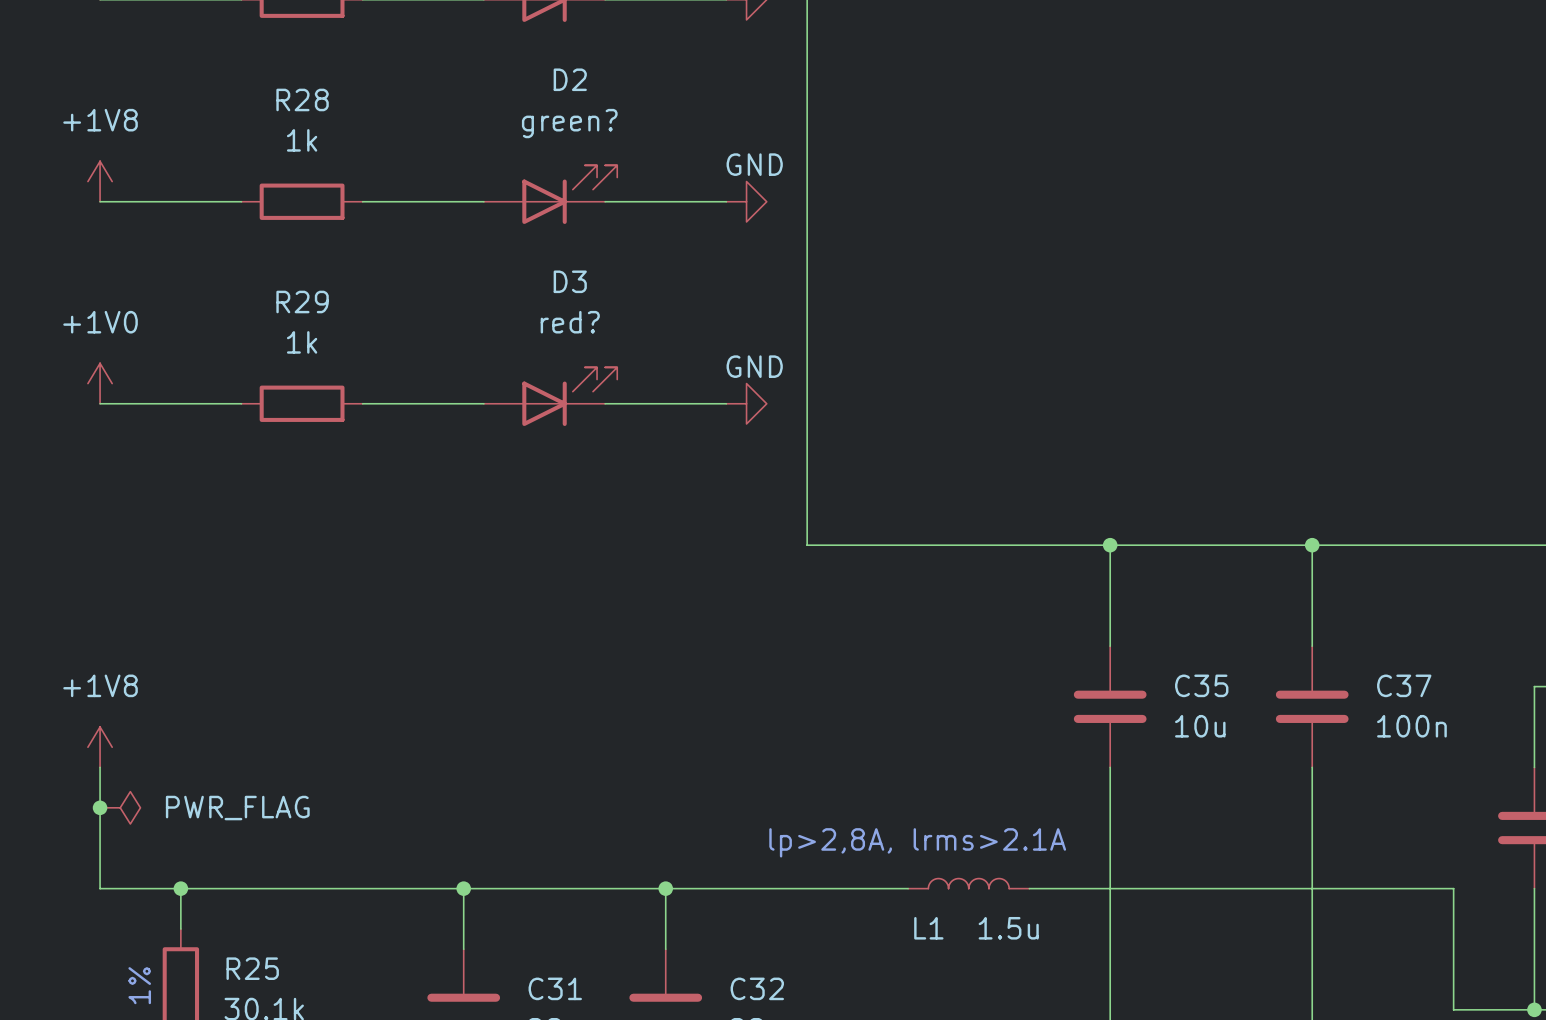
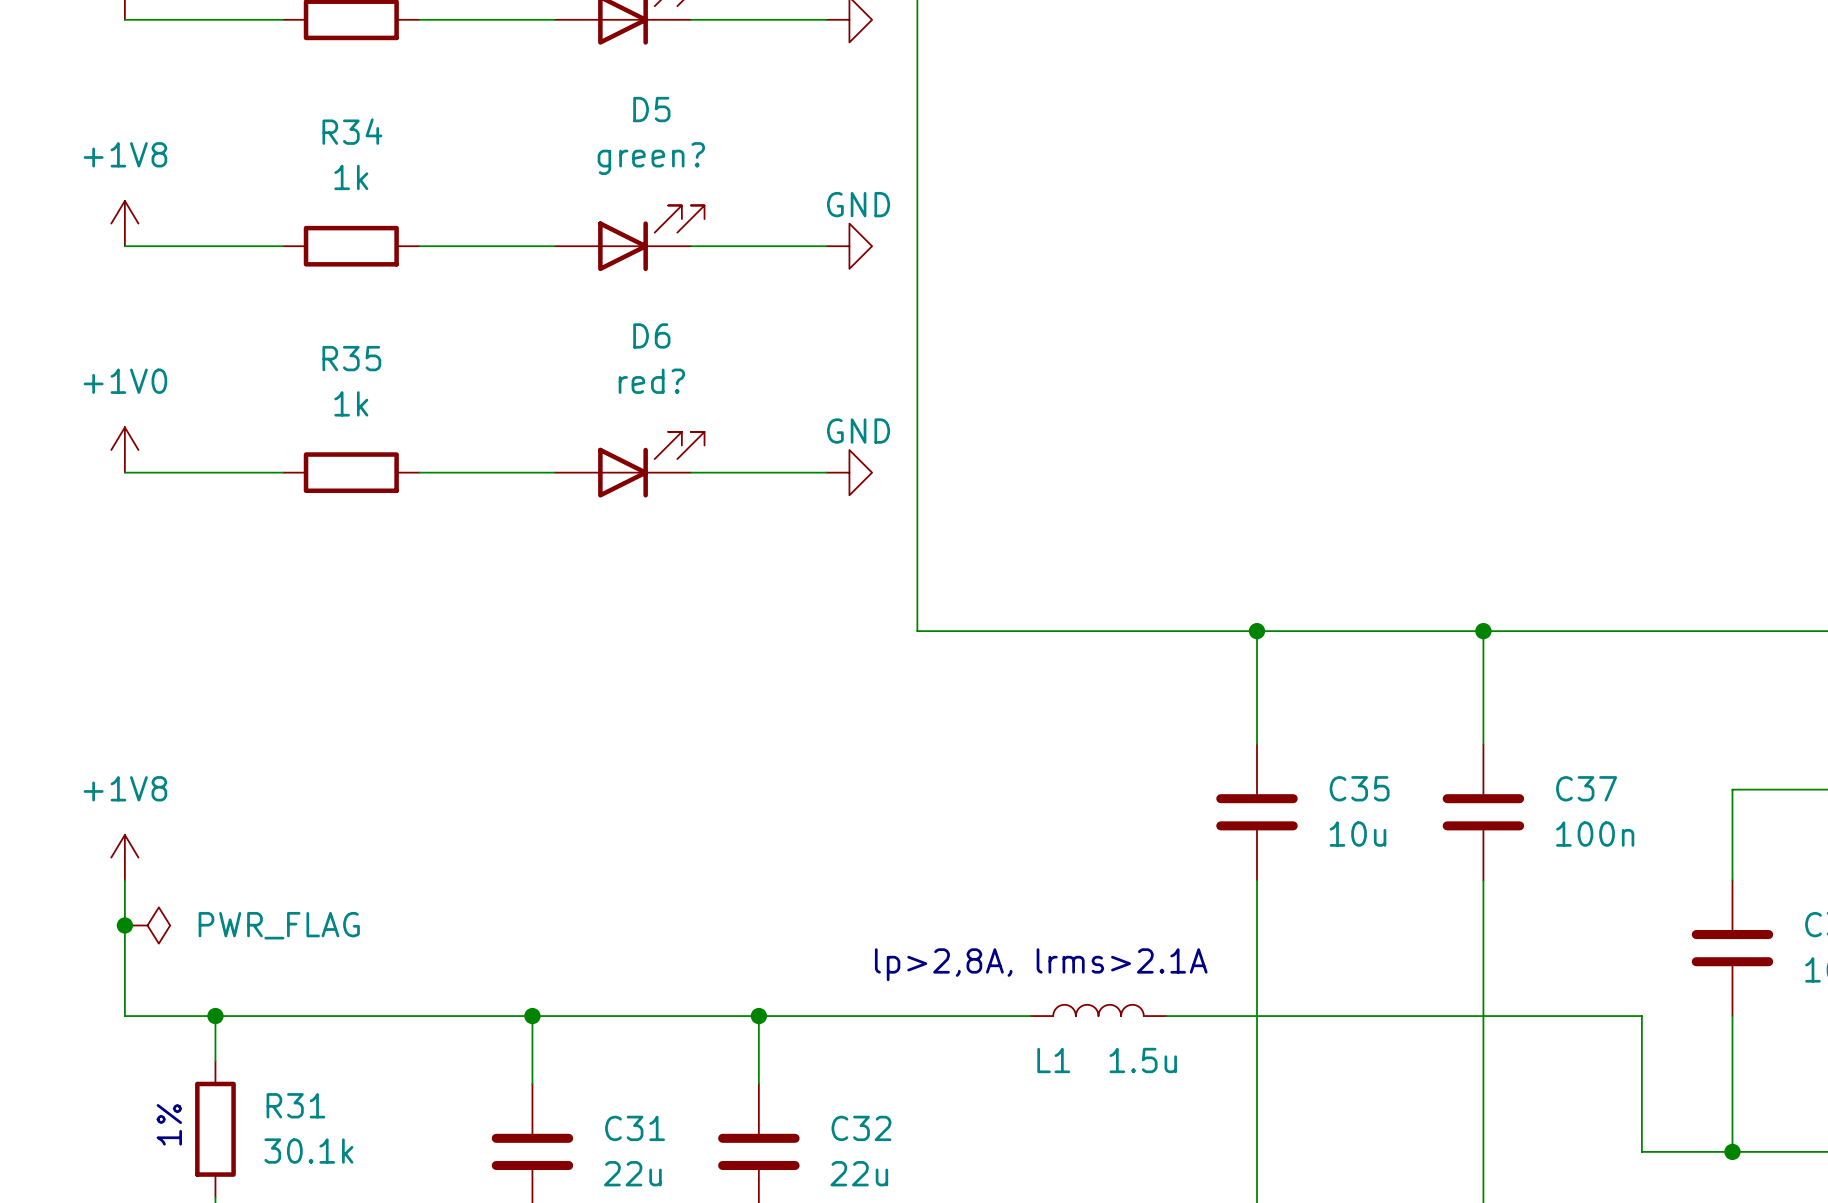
D2 name: D2 (570, 79) -> D5 (651, 109)
R28 name: R28 (302, 99) -> R34 (352, 131)
D3 name: D3 (570, 281) -> D6 (651, 335)
R29 name: R29 (302, 302) -> R35 (351, 358)
R25 name: R25 (252, 968) -> R31 (295, 1105)

